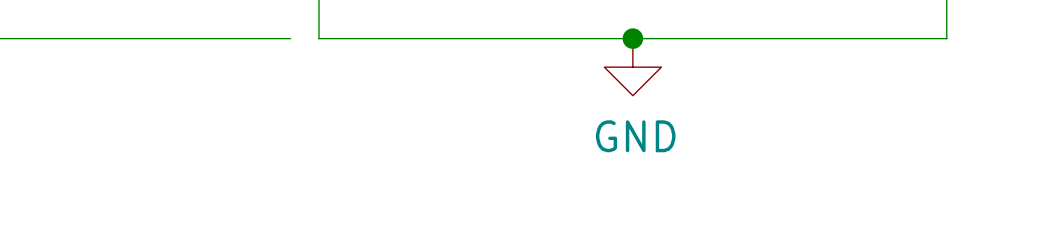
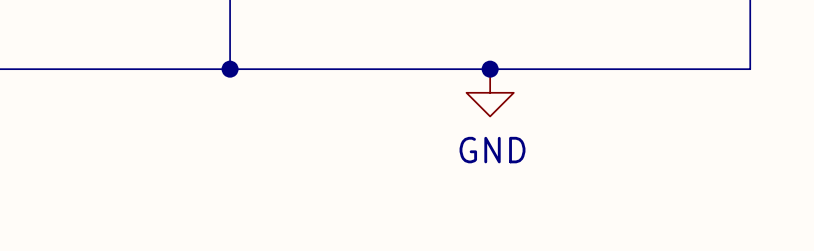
wire: none -> (206, 69) (230, 69)
junction: none -> (230, 69)

